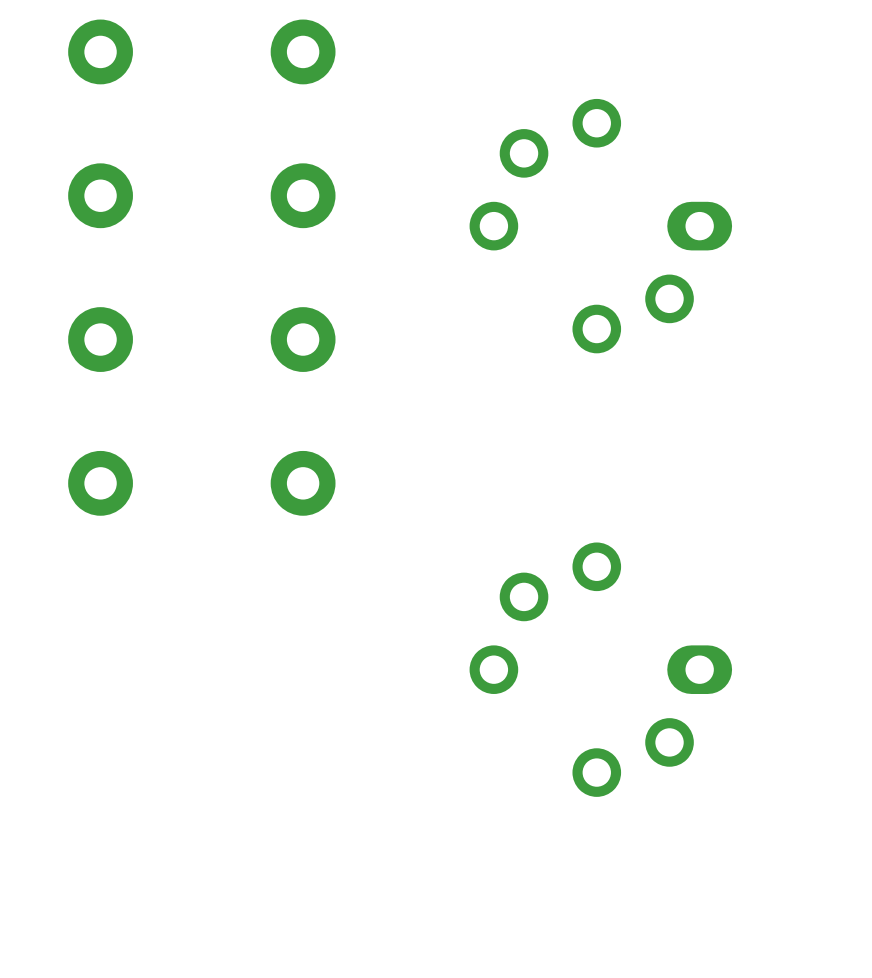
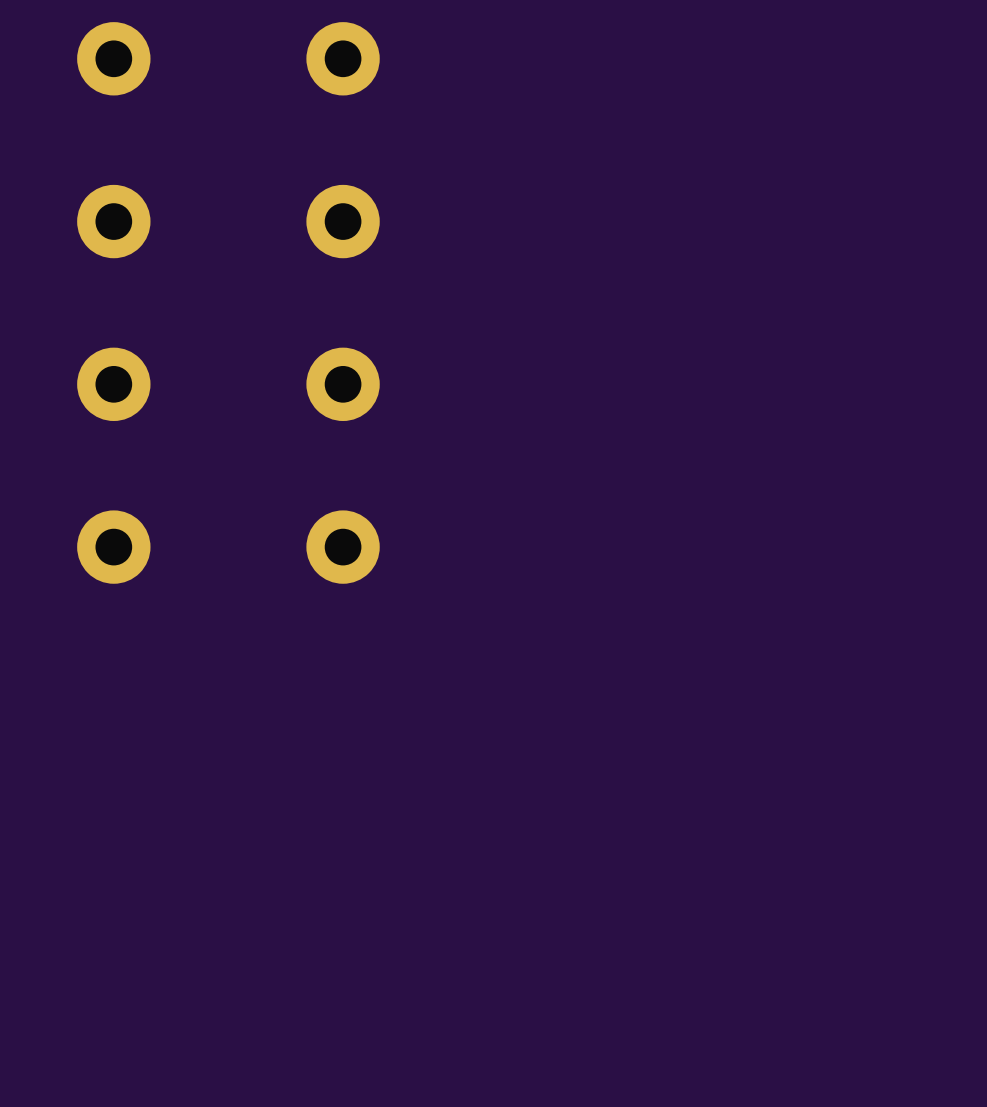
part: (600, 226) -> none
part: (600, 669) -> none

